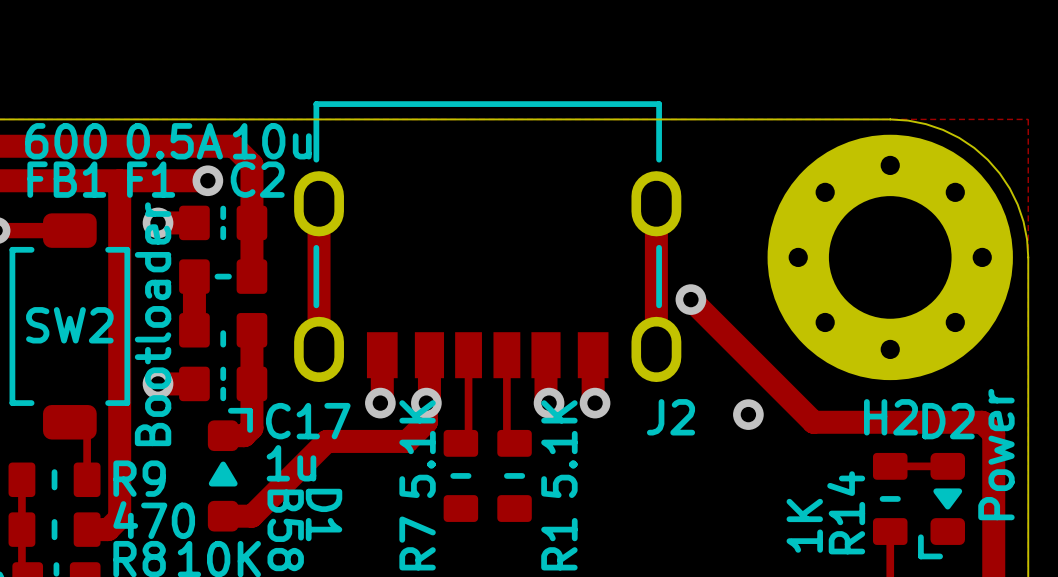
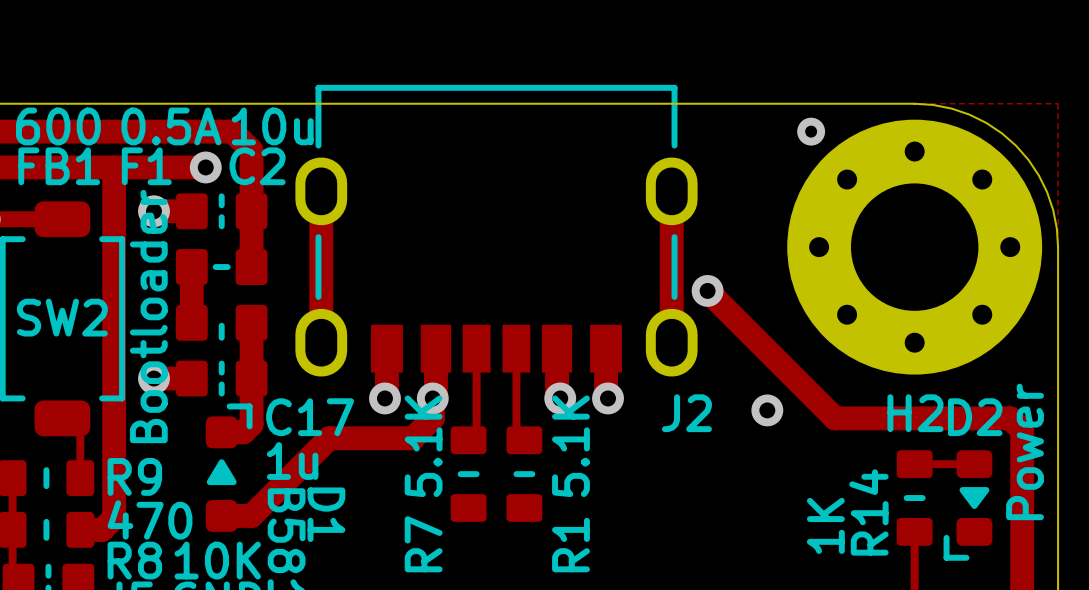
via: none -> (811, 131)

